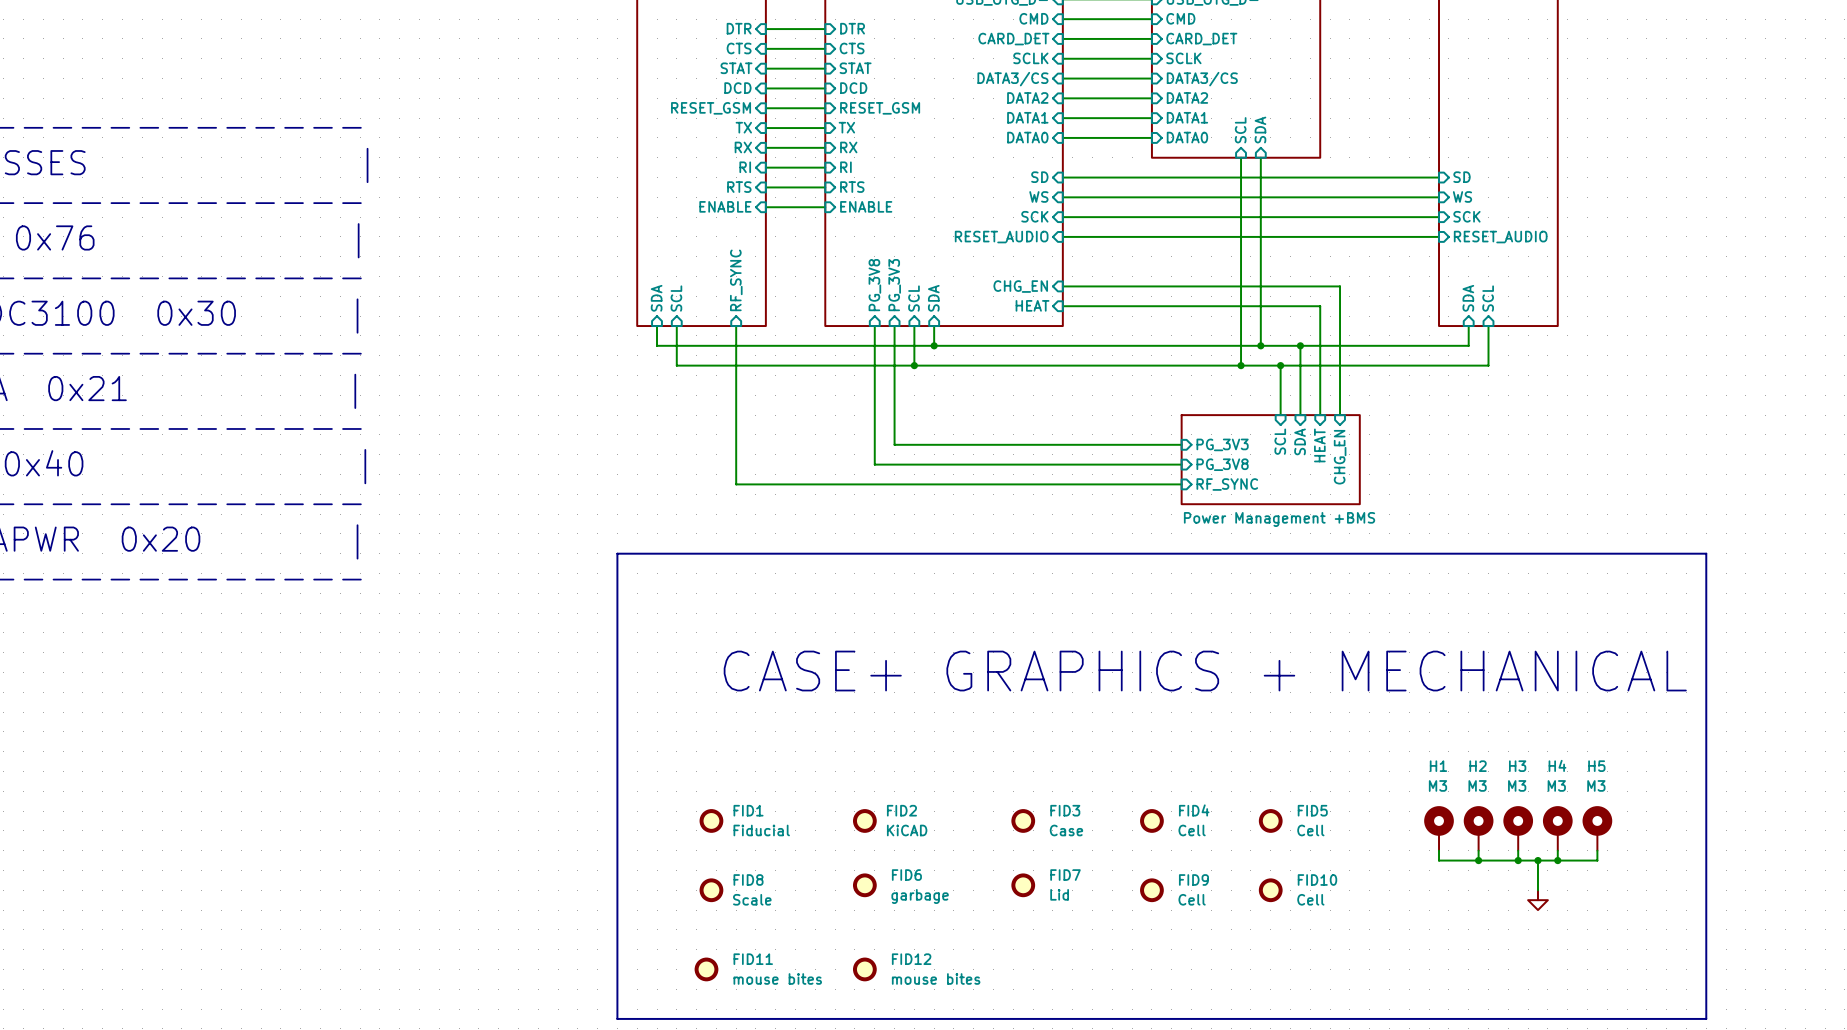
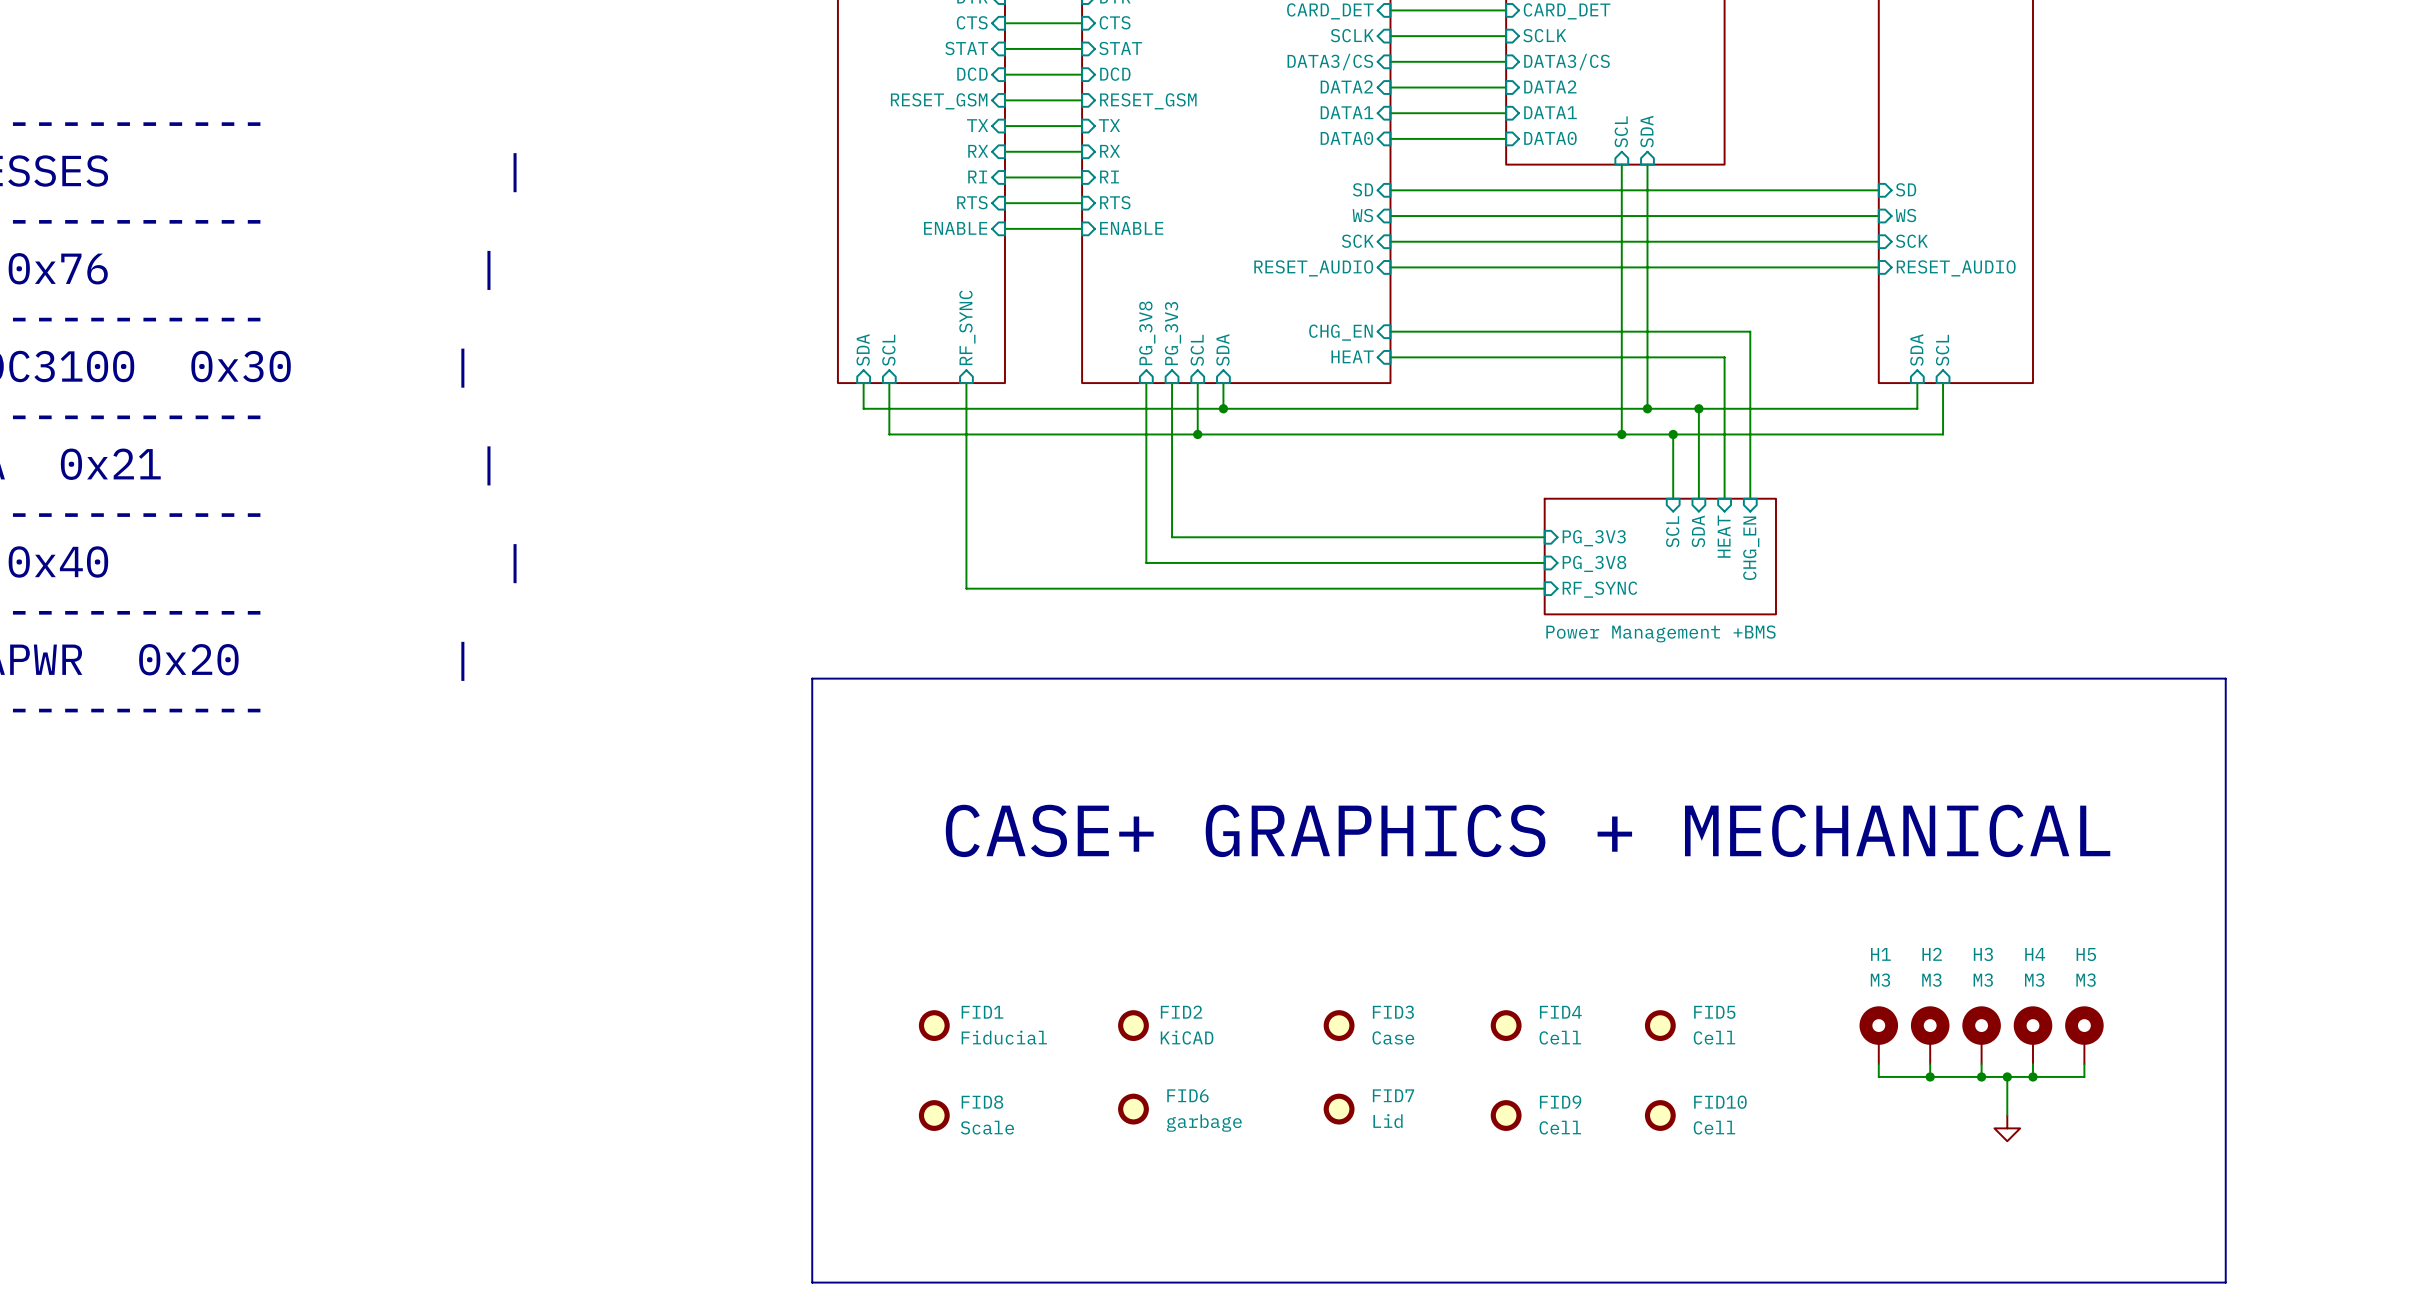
FID11: mouse bites (706, 969) -> none
FID12: mouse bites (864, 969) -> none

